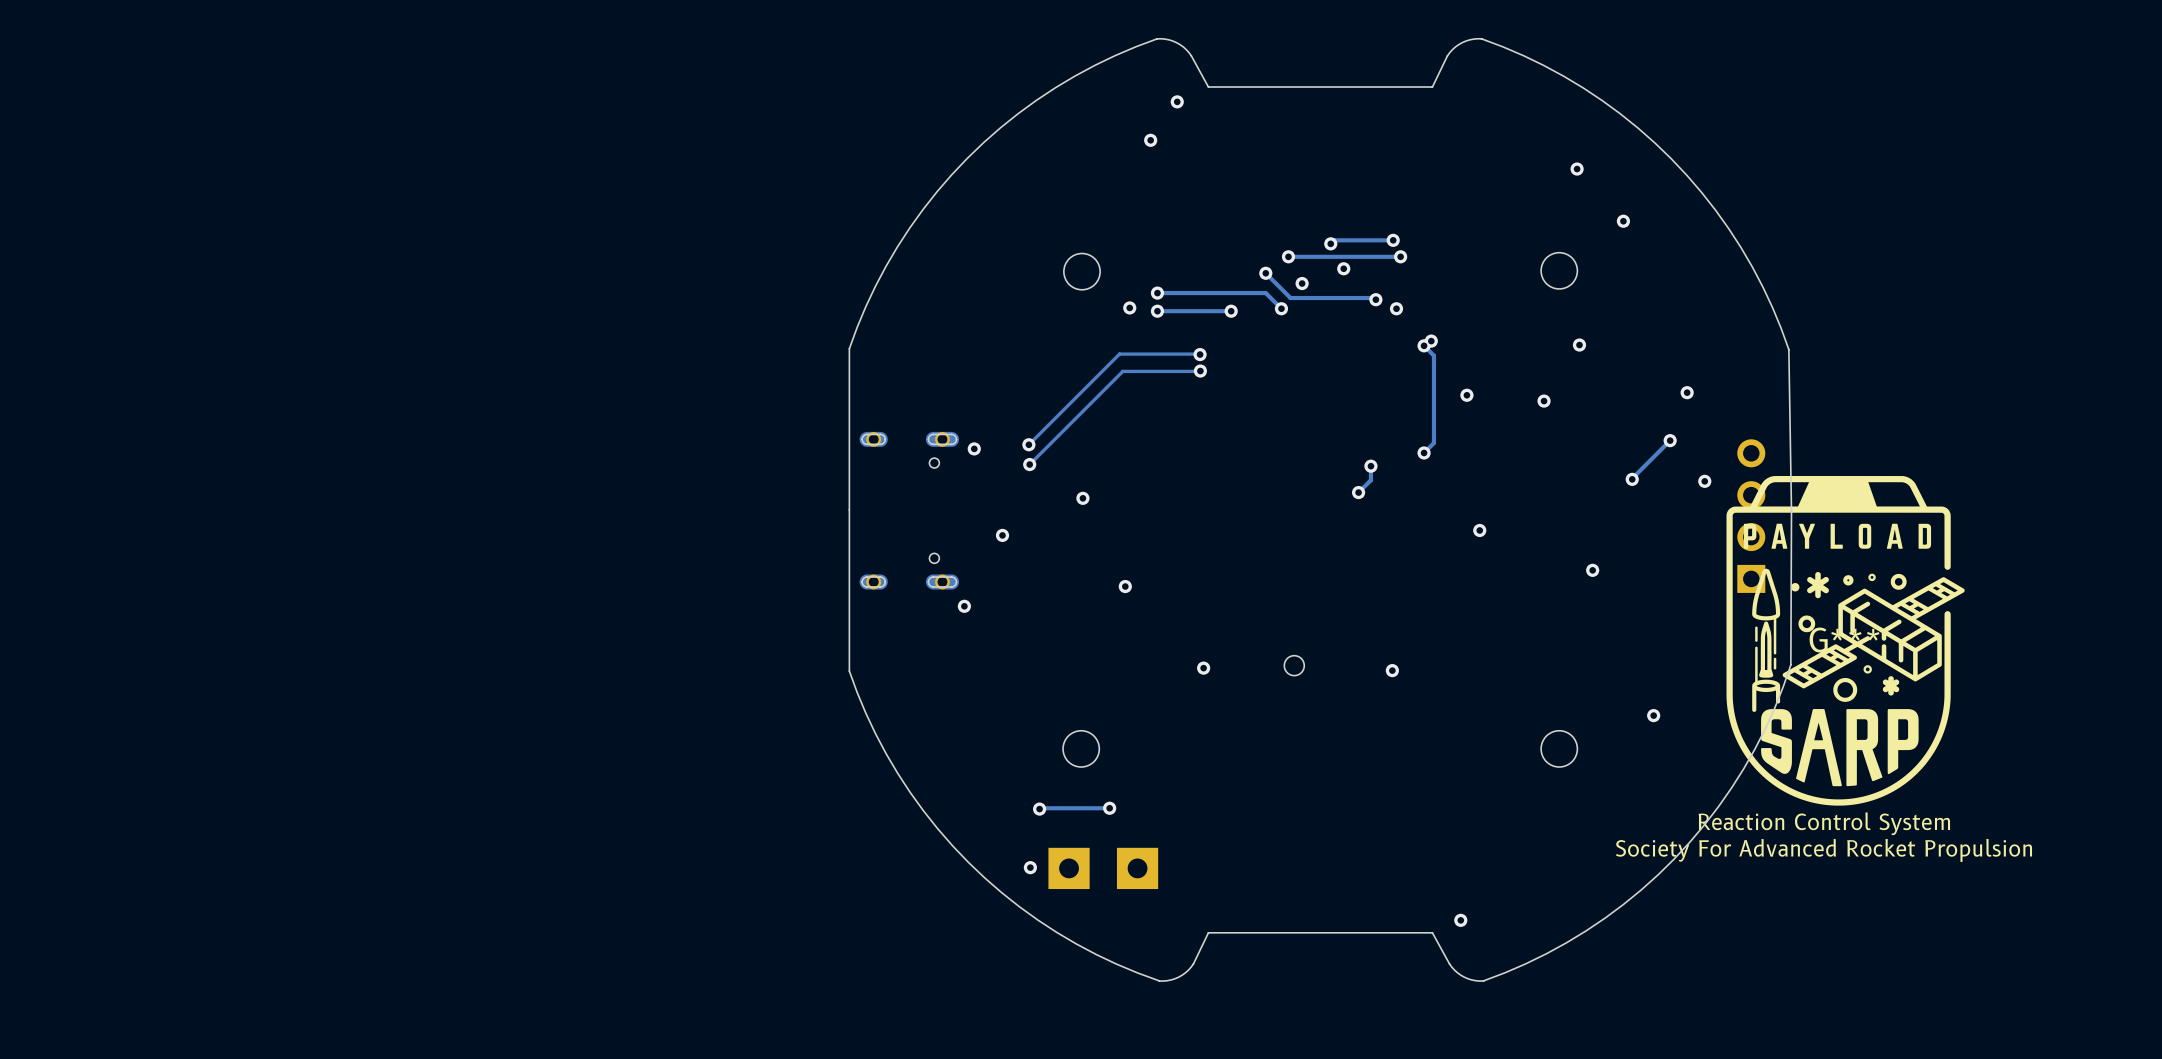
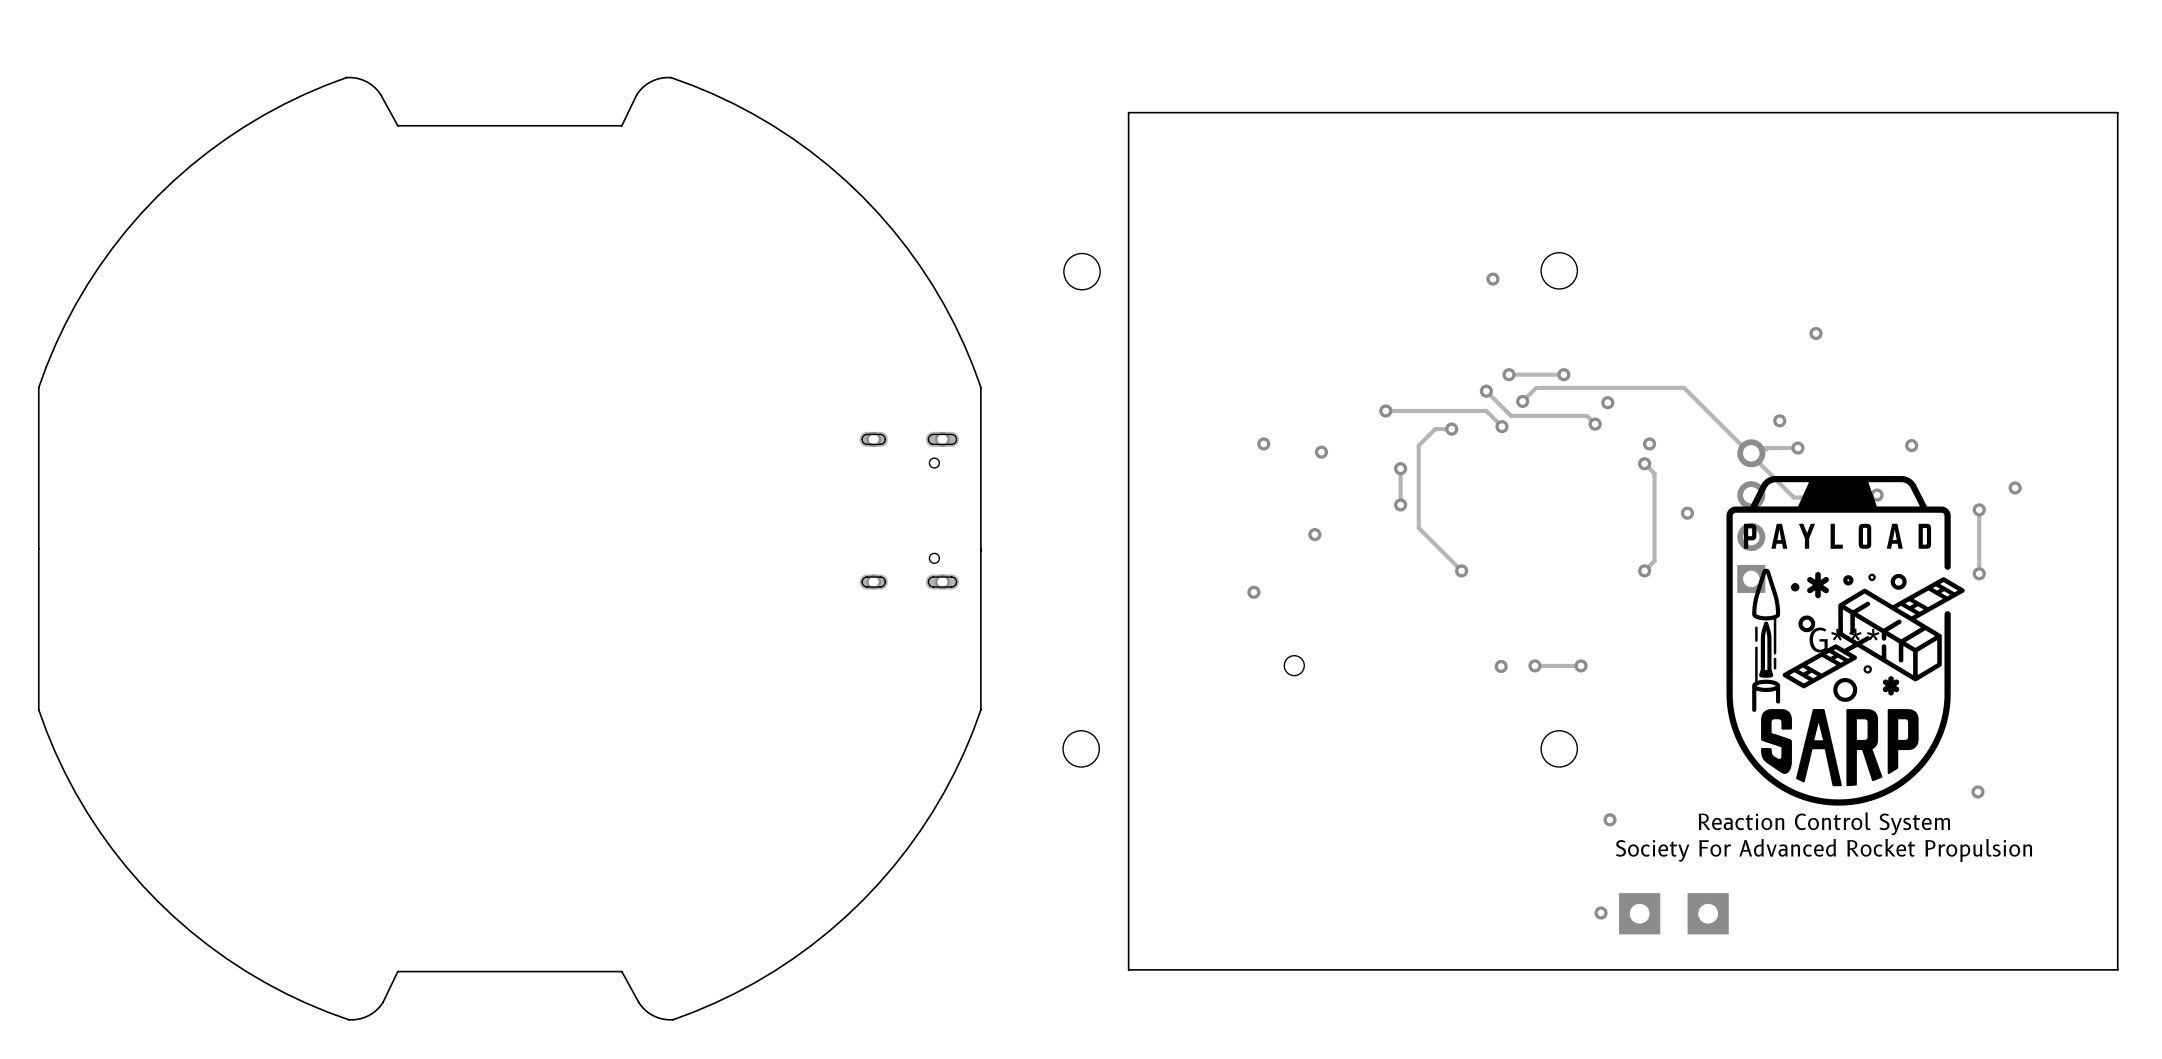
board edge: none -> (671, 77) (713, 94) (753, 114) (792, 138) (828, 165) (862, 196) (906, 247) (932, 285) (954, 324) (980, 387) (980, 709) (964, 751) (944, 792) (920, 830) (893, 866) (862, 900) (829, 930) (774, 970) (735, 993) (694, 1011) (669, 1019) (653, 1015) (643, 1008) (621, 971) (397, 971) (377, 1008) (364, 1017) (348, 1019) (285, 993) (246, 971) (208, 945) (173, 916) (141, 884) (112, 849) (87, 812) (64, 772) (38, 709) (38, 387) (64, 324) (86, 285) (112, 248) (141, 213) (173, 181) (207, 152) (244, 126) (284, 104) (325, 85) (350, 77) (365, 81) (375, 88) (397, 125) (621, 125) (641, 88) (655, 79) (671, 77)
via: (1177, 101) -> none
board edge: none -> (2117, 112) (1128, 112) (1128, 969) (2117, 969) (2117, 112)
via: (1150, 140) -> none
via: (1577, 169) -> none
via: (1623, 221) -> none
track: (1393, 240) (1334, 240) (1330, 243) -> none
via: (1393, 240) -> none
via: (1330, 243) -> none
via: (1288, 256) -> none
track: (1400, 256) (1288, 256) -> none
via: (1400, 256) -> none
via: (1343, 268) -> none
track: (1265, 273) (1290, 298) (1374, 298) (1375, 299) -> none
via: (1265, 273) -> none
via: none -> (1492, 279)
via: (1302, 283) -> none
track: (1157, 293) (1265, 293) (1281, 308) -> none
via: (1157, 293) -> none
via: (1375, 299) -> none
via: (1129, 307) -> none
via: (1281, 308) -> none
via: (1396, 308) -> none
via: (1157, 311) -> none
track: (1231, 311) (1157, 311) -> none
via: (1231, 311) -> none
via: none -> (1816, 333)
via: (1431, 341) -> none
track: (1424, 345) (1433, 355) (1433, 443) (1424, 452) -> (1644, 463) (1654, 473) (1654, 560) (1644, 570)
via: (1424, 345) -> none
via: (1579, 345) -> none
track: (1200, 354) (1119, 354) (1028, 444) -> none
via: (1200, 354) -> none
track: (1200, 371) (1122, 371) (1029, 464) -> none
via: (1200, 371) -> none
via: none -> (1509, 374)
track: none -> (1563, 374) (1509, 374)
via: none -> (1563, 374)
track: none -> (1486, 391) (1511, 415) (1586, 415) (1595, 424)
via: none -> (1486, 391)
via: (1687, 392) -> none
via: (1466, 395) -> none
track: none -> (1522, 401) (1536, 387) (1684, 387) (1793, 497) (1874, 497) (1877, 495)
via: none -> (1522, 401)
via: (1544, 401) -> none
via: none -> (1607, 402)
track: none -> (1385, 410) (1486, 410) (1502, 426)
via: none -> (1385, 410)
via: none -> (1779, 420)
via: none -> (1595, 424)
via: none -> (1502, 426)
track: none -> (1451, 429) (1435, 429) (1418, 445) (1418, 528) (1461, 570)
via: none -> (1451, 429)
track: (1670, 440) (1632, 479) -> none
via: (1670, 440) -> none
via: none -> (1263, 443)
via: none -> (1649, 443)
via: (1028, 444) -> none
via: none -> (1911, 445)
via: (974, 448) -> none
track: none -> (1797, 448) (1764, 448) (1766, 449)
via: none -> (1797, 448)
via: none -> (1321, 452)
via: (1424, 452) -> none
via: none -> (1644, 463)
via: (1029, 464) -> none
track: (1370, 466) (1370, 480) (1358, 492) -> none
via: (1370, 466) -> none
track: none -> (1400, 468) (1400, 504)
via: none -> (1400, 468)
via: (1632, 479) -> none
via: (1704, 481) -> none
via: none -> (2015, 487)
via: (1358, 492) -> none
via: none -> (1877, 495)
via: (1082, 498) -> none
via: none -> (1400, 504)
board edge: (1791, 509) (1790, 664) (1765, 728) (1731, 787) (1689, 842) (1658, 874) (1623, 904) (1566, 942) (1526, 963) (1483, 980) -> none
track: none -> (1979, 509) (1979, 573)
via: none -> (1979, 509)
board edge: (1791, 512) (1788, 349) (1772, 307) (1752, 266) (1715, 210) (1686, 175) (1654, 142) (1602, 100) (1543, 65) (1502, 46) (1477, 38) (1462, 42) (1452, 49) (1432, 87) (1208, 87) (1186, 49) (1172, 41) (1157, 38) (1094, 65) (1055, 87) (1018, 113) (983, 142) (951, 174) (909, 227) (875, 286) (849, 348) (849, 671) (865, 713) (897, 773) (937, 828) (968, 862) (1001, 892) (1056, 932) (1096, 954) (1159, 980) -> none
via: none -> (1687, 513)
via: (1479, 530) -> none
via: none -> (1314, 534)
via: (1002, 535) -> none
via: none -> (1461, 570)
via: (1592, 570) -> none
via: none -> (1644, 570)
via: none -> (1979, 573)
via: (1125, 586) -> none
via: none -> (1253, 592)
via: (964, 606) -> none
via: none -> (1534, 665)
track: none -> (1581, 665) (1534, 665)
via: none -> (1581, 665)
via: none -> (1501, 666)
via: (1203, 668) -> none
via: (1392, 670) -> none
via: (1653, 715) -> none
via: none -> (1977, 791)
track: (1109, 808) (1039, 809) -> none
via: (1109, 808) -> none
via: (1039, 809) -> none
via: none -> (1609, 819)
via: (1030, 867) -> none
part: (1069, 868) -> none
part: (1137, 868) -> none
via: none -> (1601, 912)
part: none -> (1639, 913)
part: none -> (1708, 913)
via: (1460, 920) -> none
board edge: (1483, 980) (1467, 978) (1454, 970) (1432, 932) (1208, 932) (1188, 970) (1175, 978) (1159, 980) -> none

